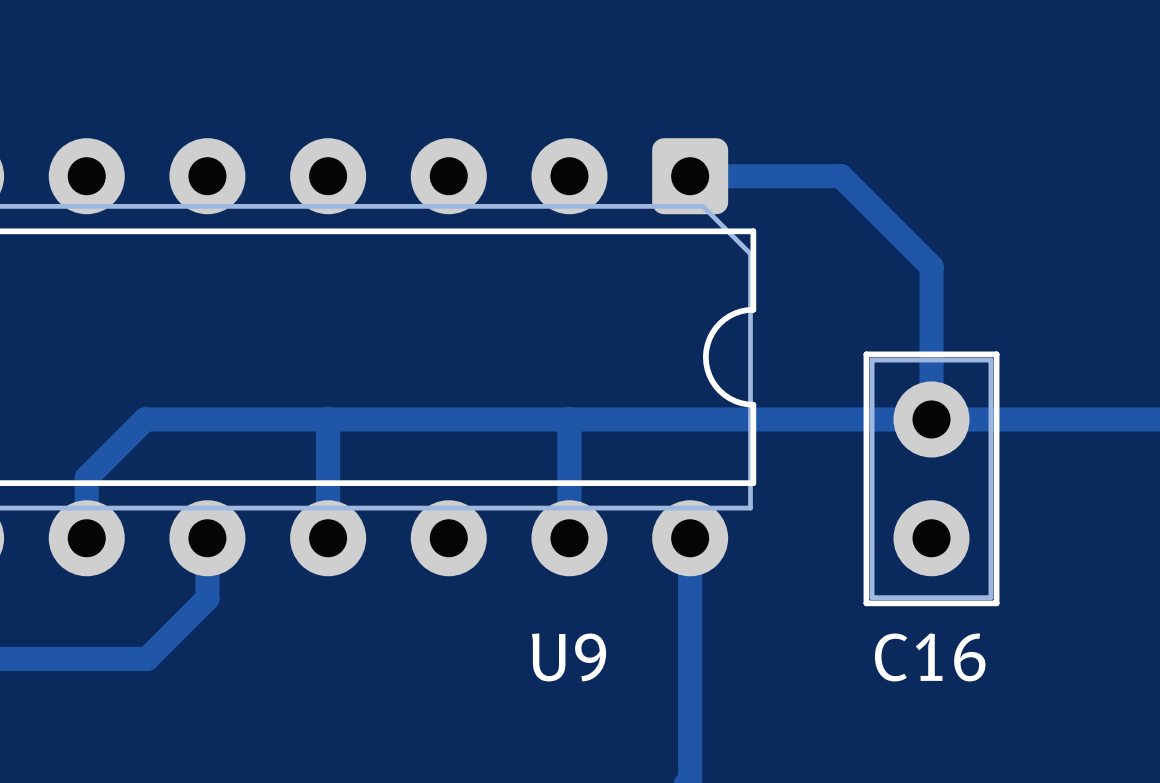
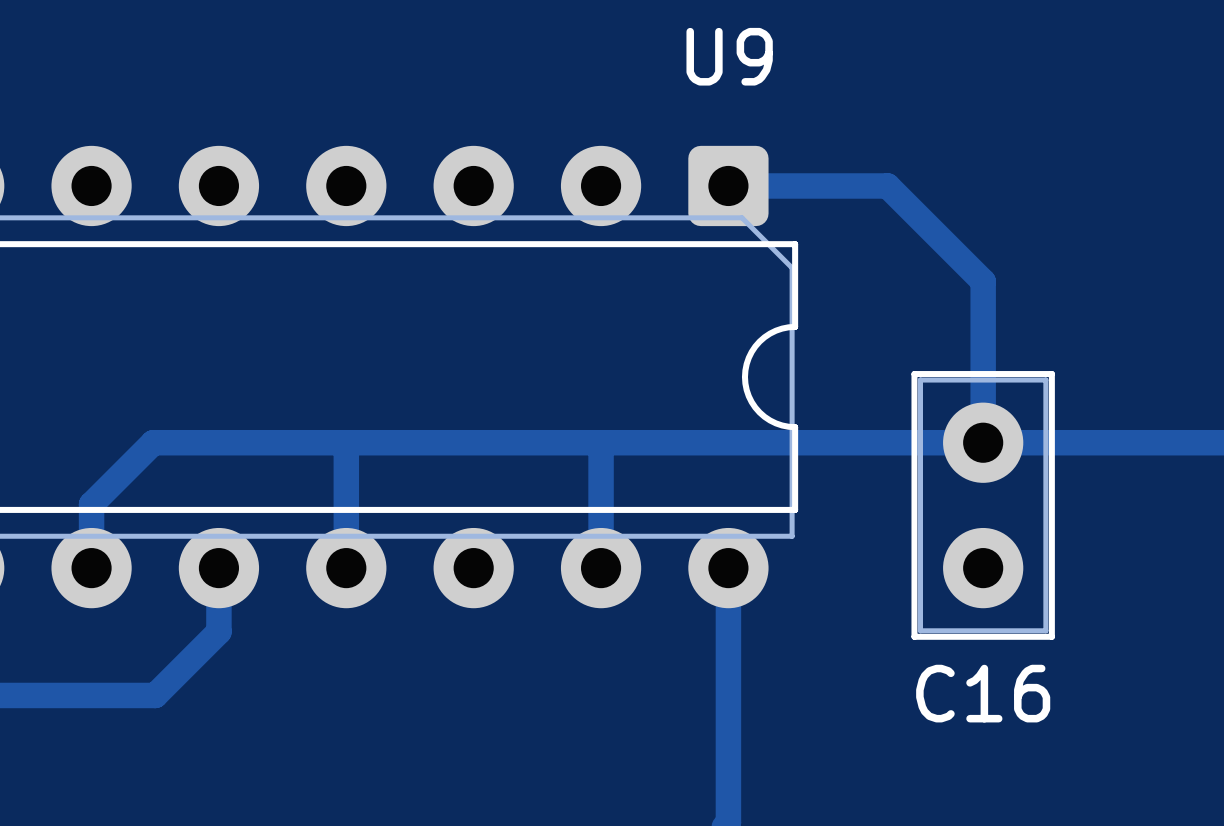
U9 name position: U9 (569, 657) -> U9 (729, 56)

